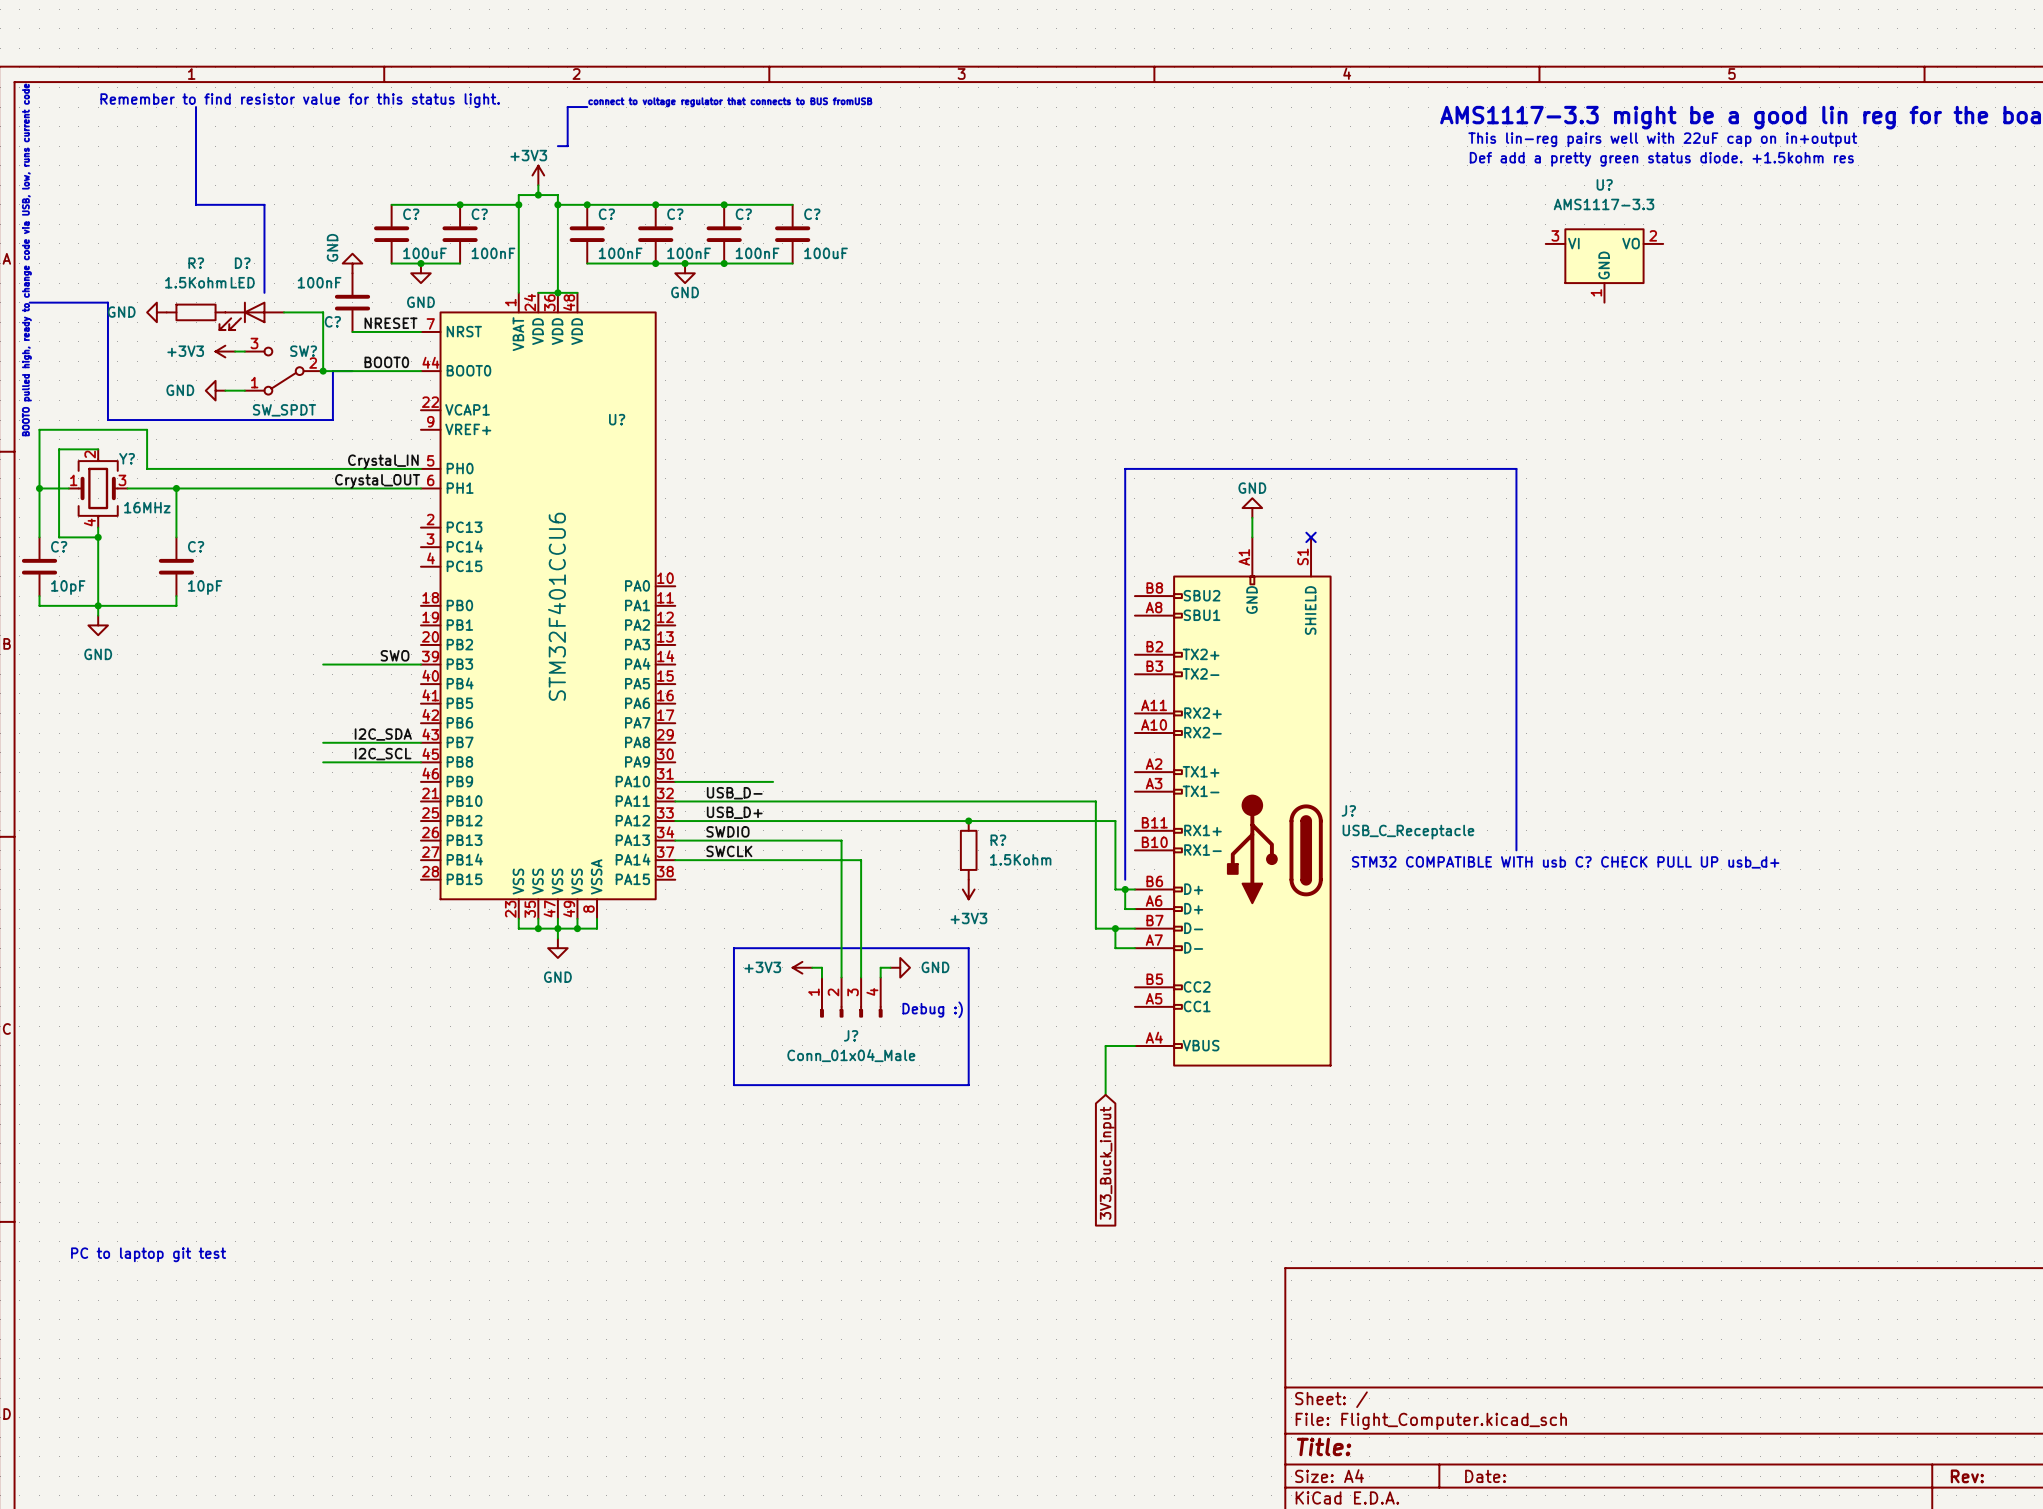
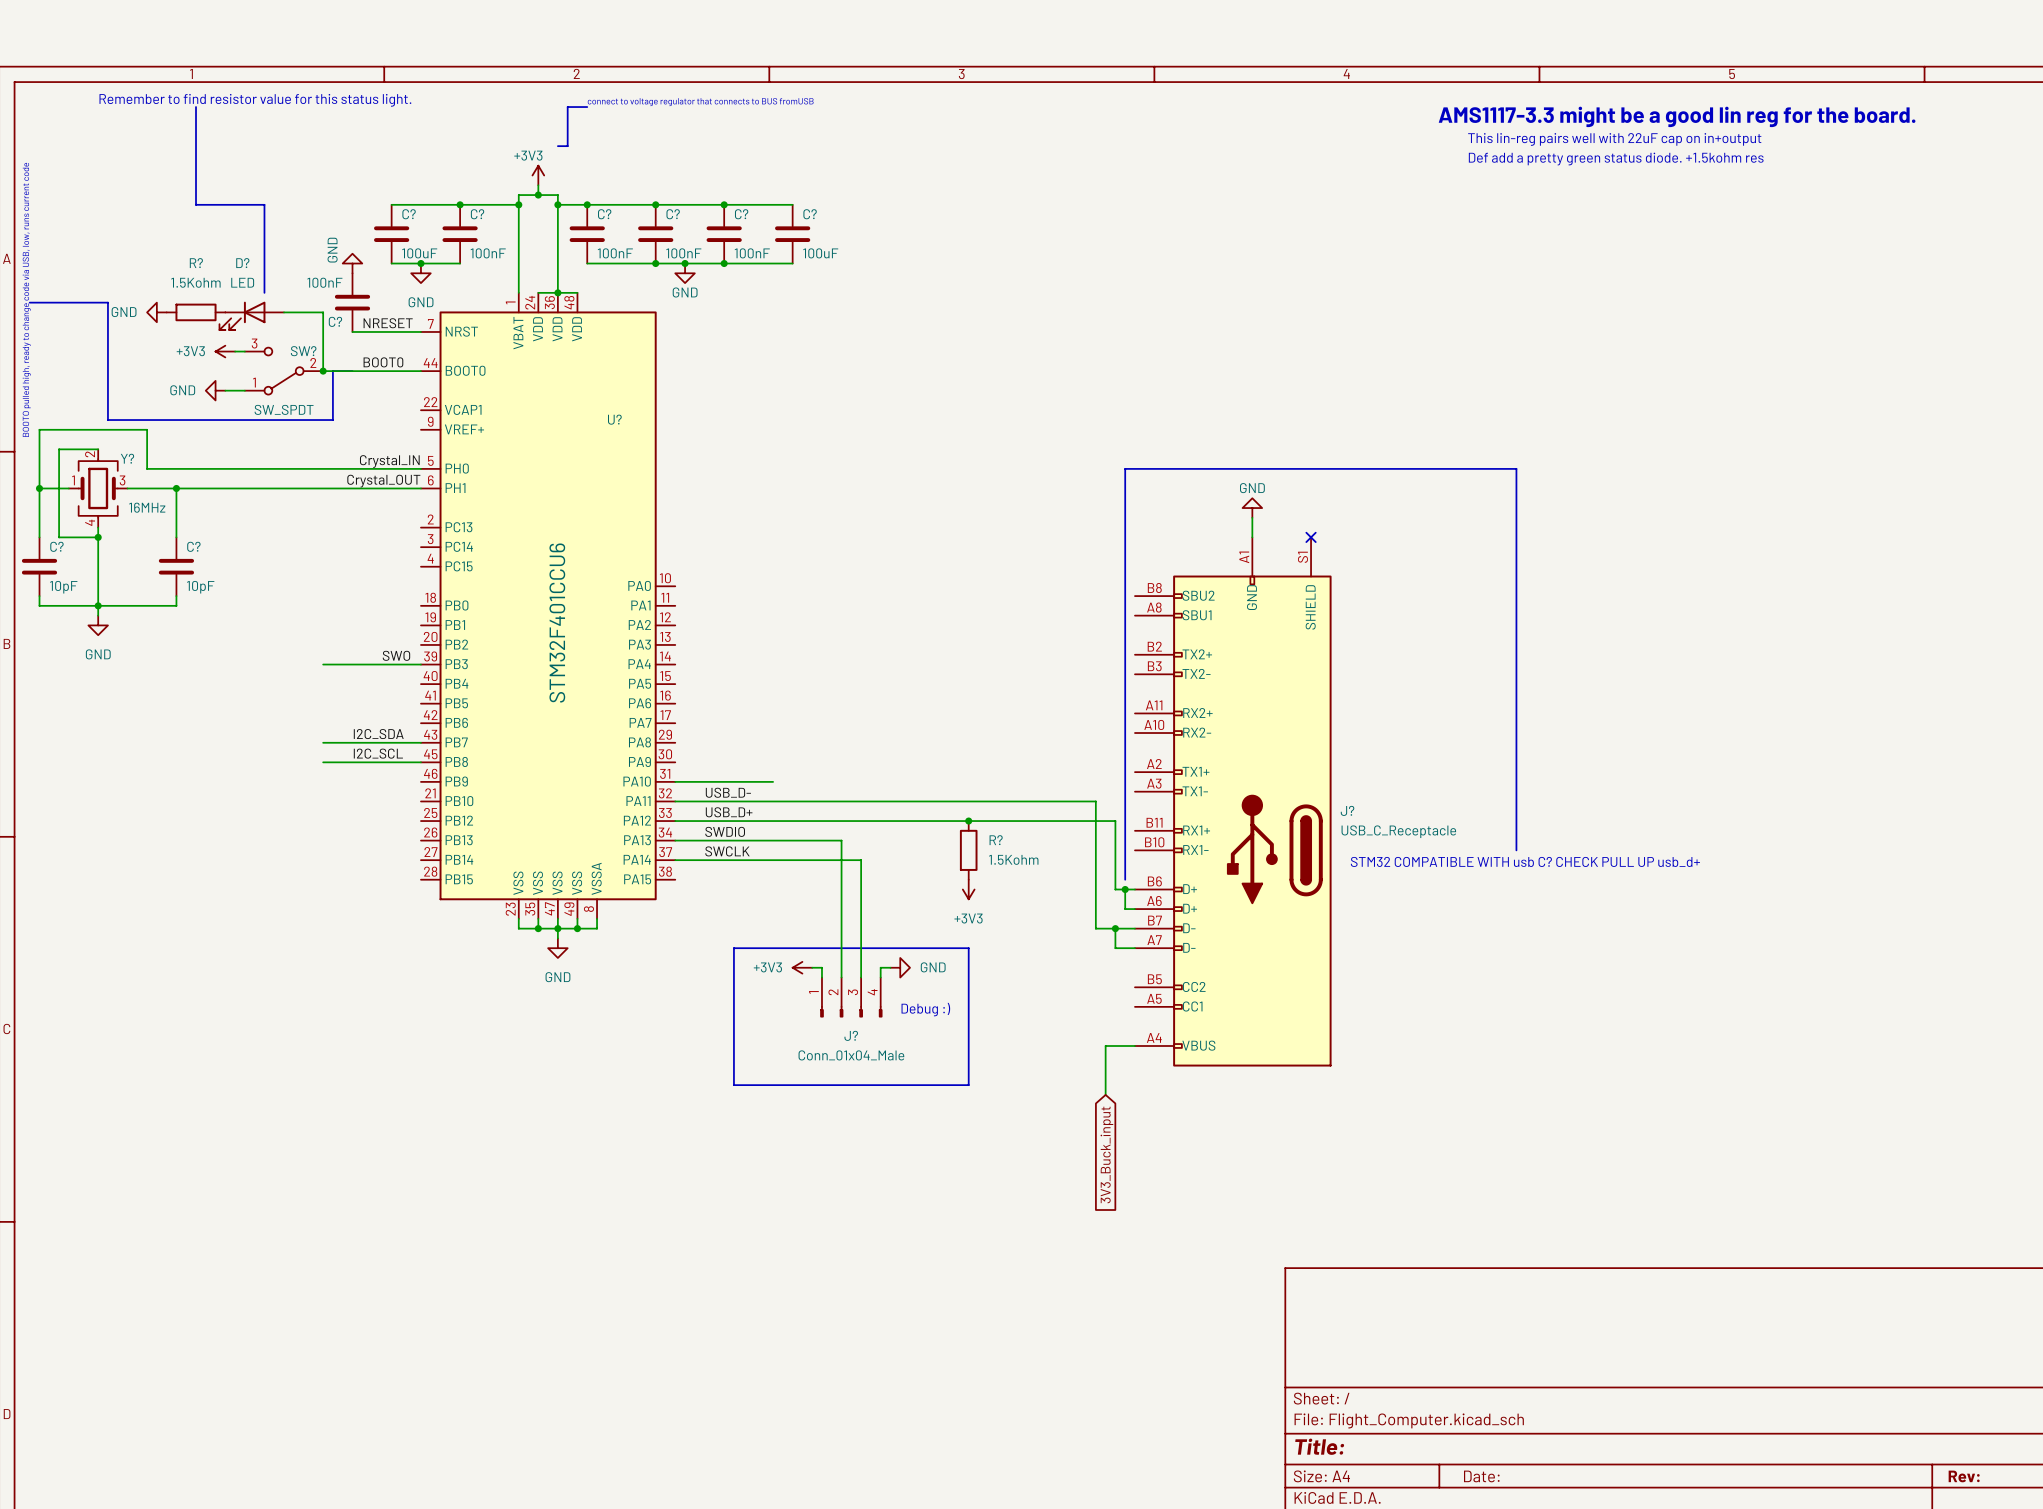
U?: AMS1117-3.3 (1604, 265) -> none
text: PC to laptop git test (148, 1254) -> none

